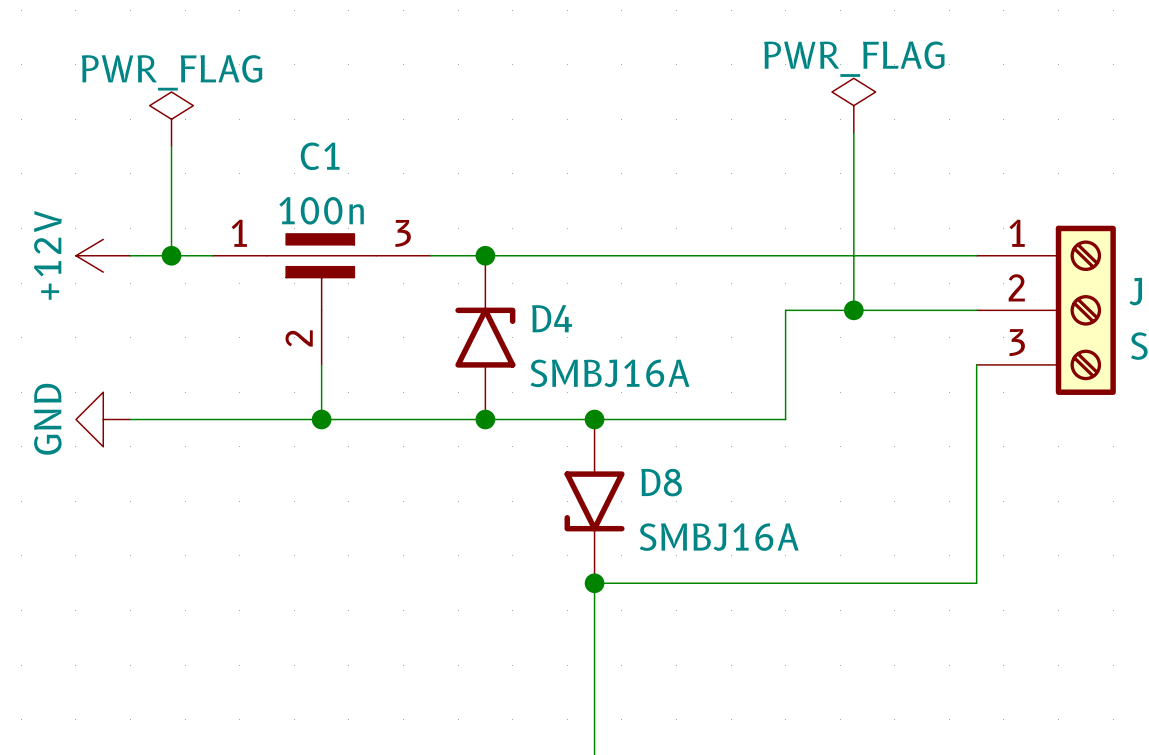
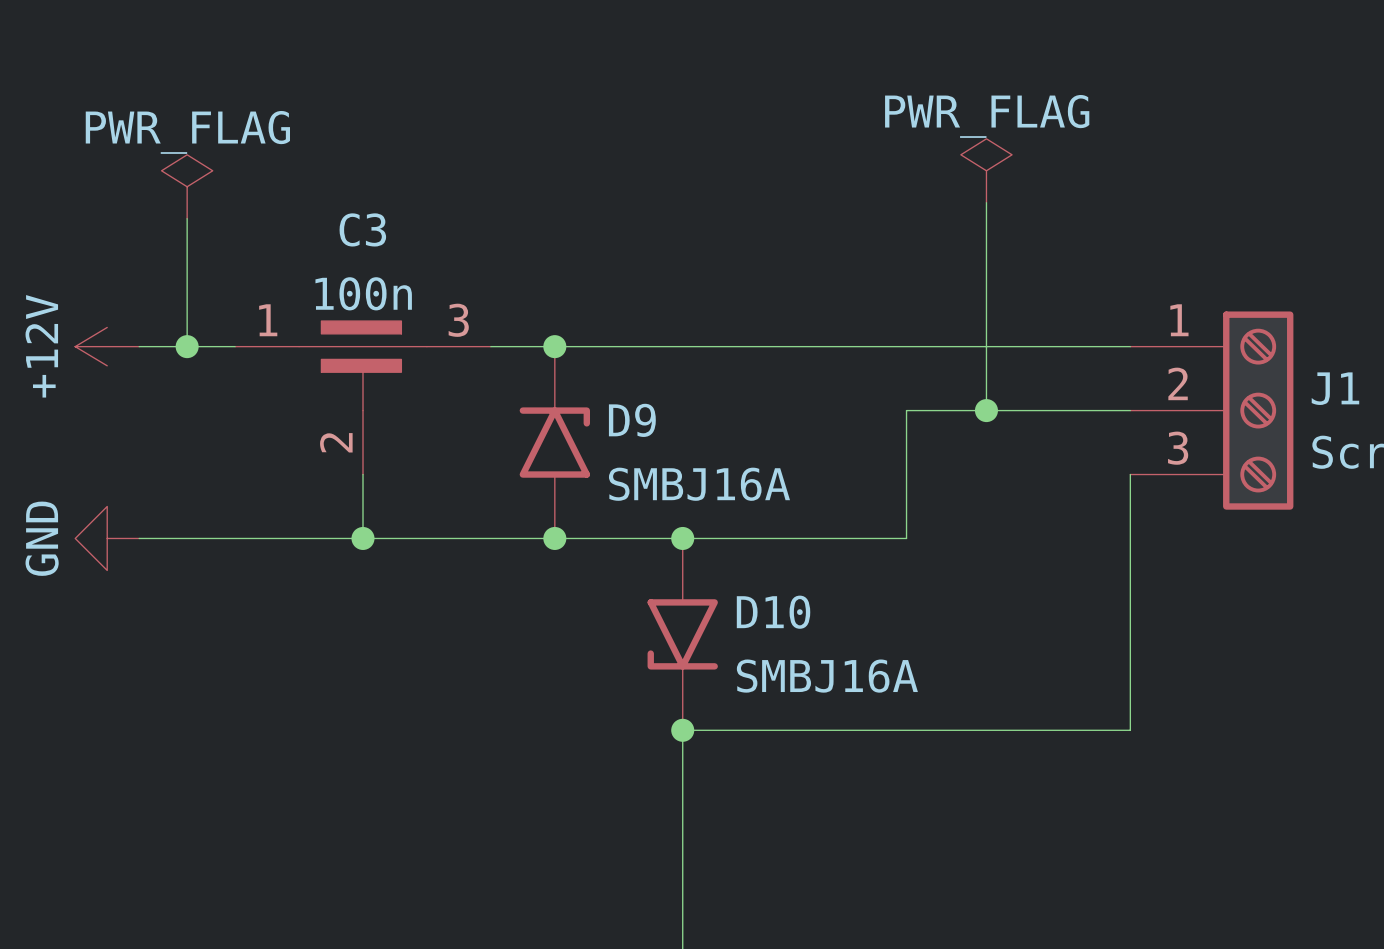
C1 name: C1 (320, 156) -> C3 (362, 229)
D4 name: D4 (552, 318) -> D9 (632, 420)
D8 name: D8 (661, 482) -> D10 (773, 612)

